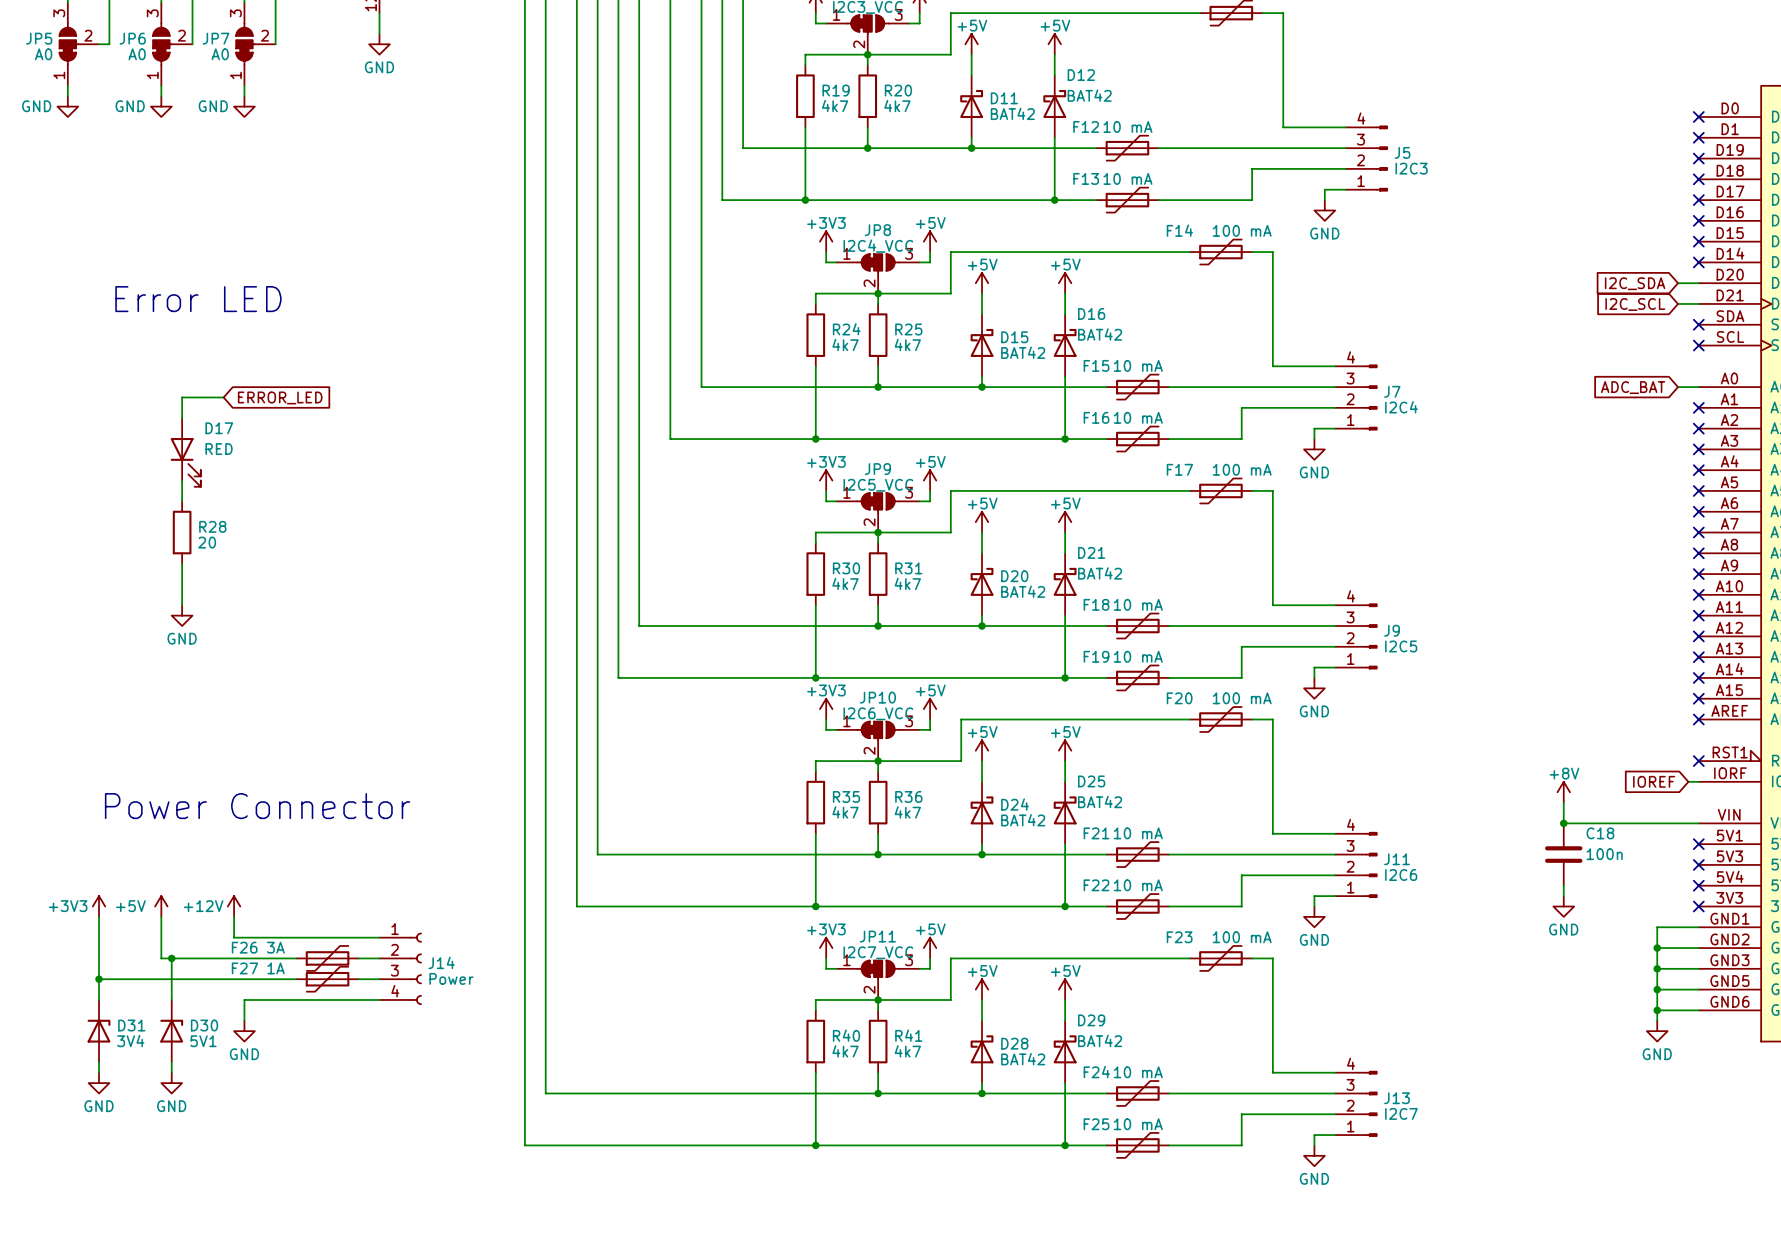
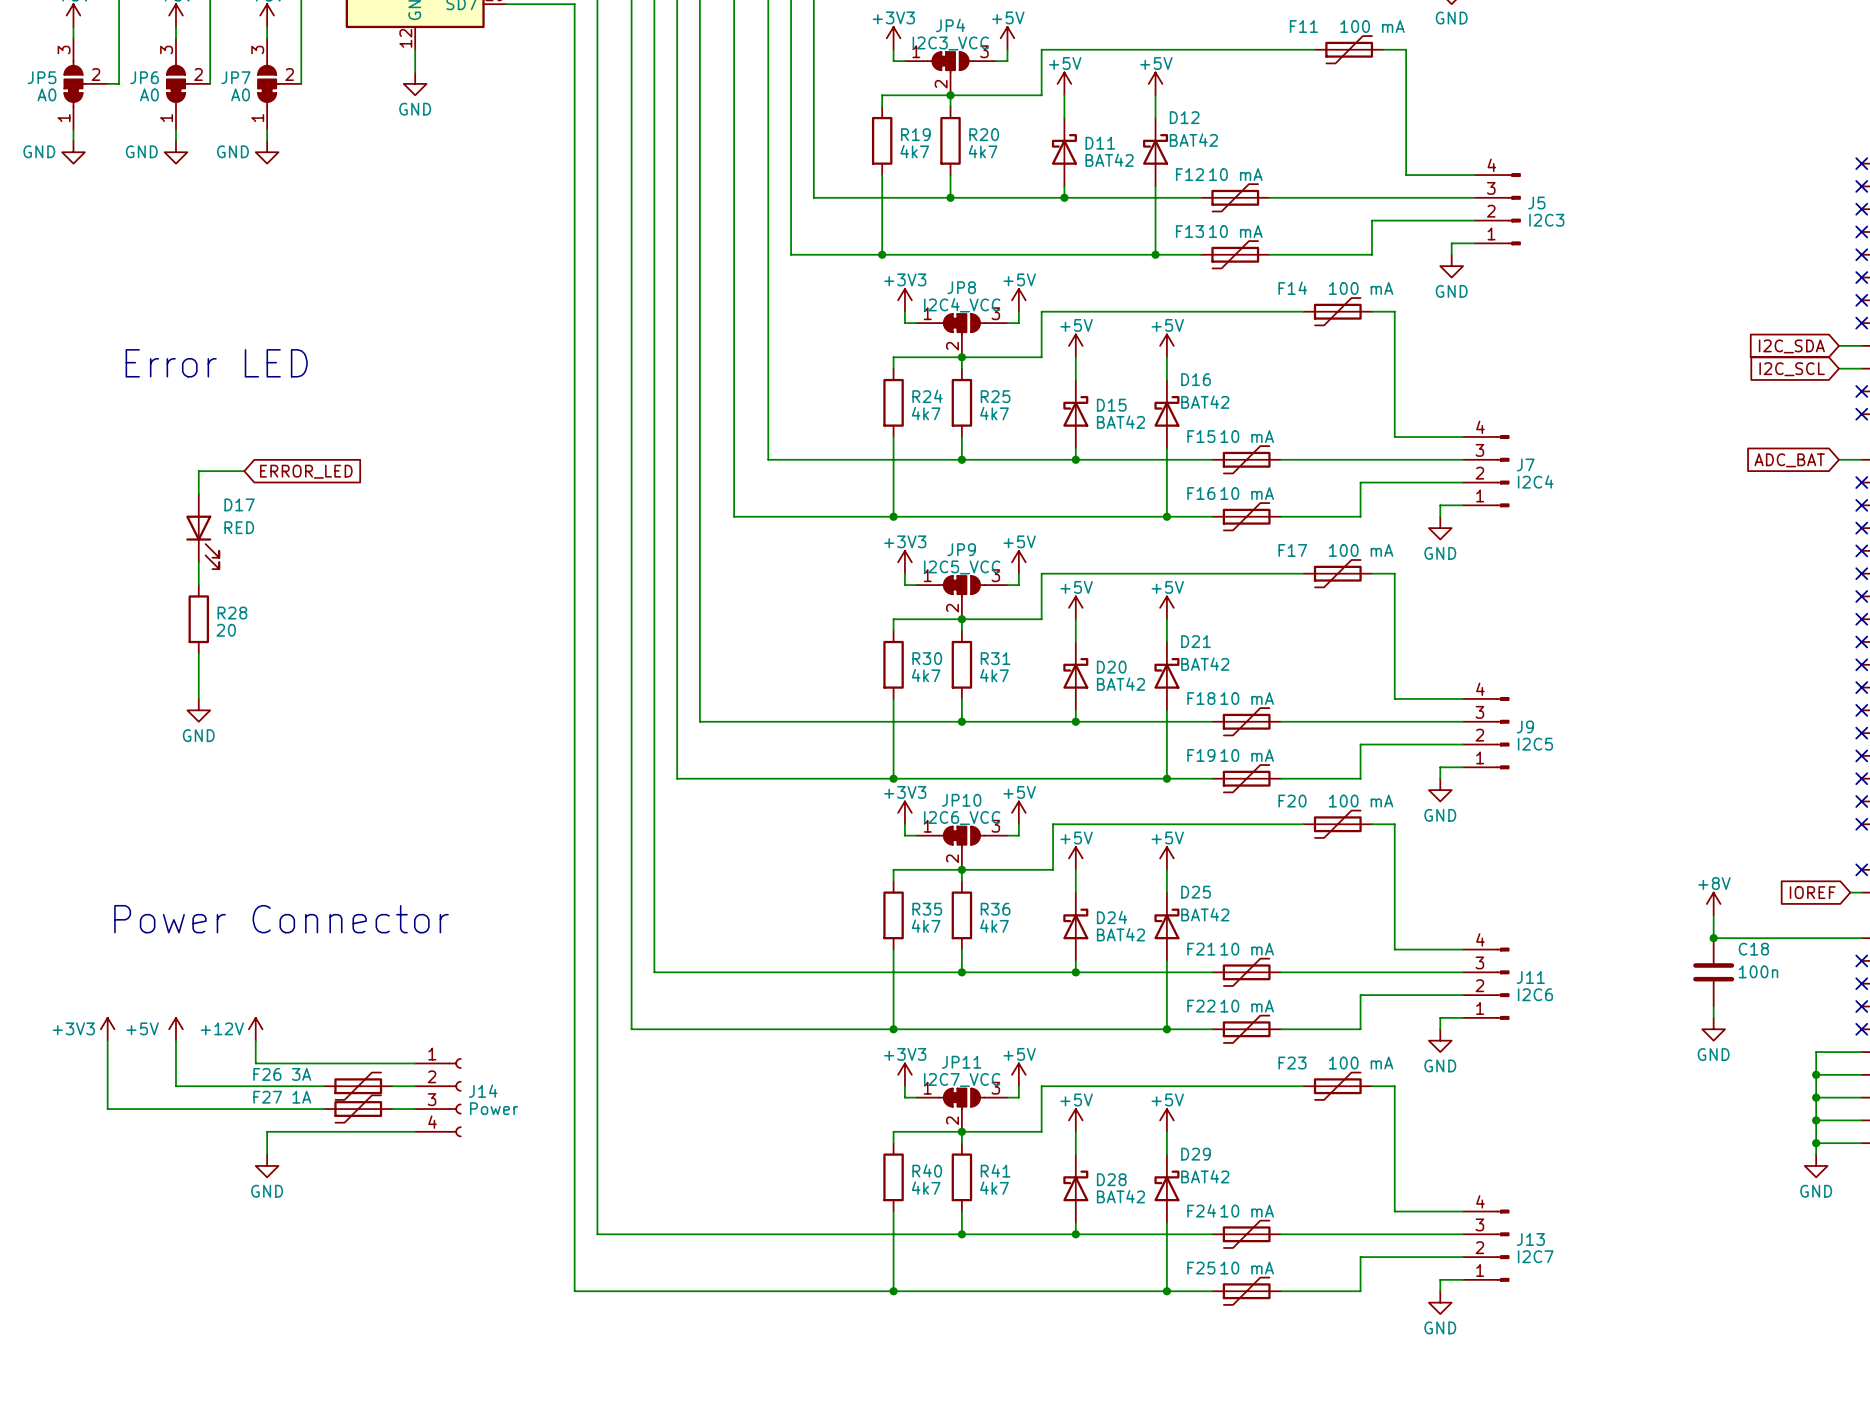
wire: (171, 958) (171, 999) -> none
junction: (171, 958) -> none
wire: (99, 979) (99, 999) -> none
junction: (99, 979) -> none
D31: 3V4 (99, 1031) -> none
D30: 5V1 (171, 1031) -> none
wire: (99, 1062) (99, 1072) -> none
wire: (171, 1062) (171, 1072) -> none
power symbol: GND (99, 1083) -> none
power symbol: GND (171, 1083) -> none

